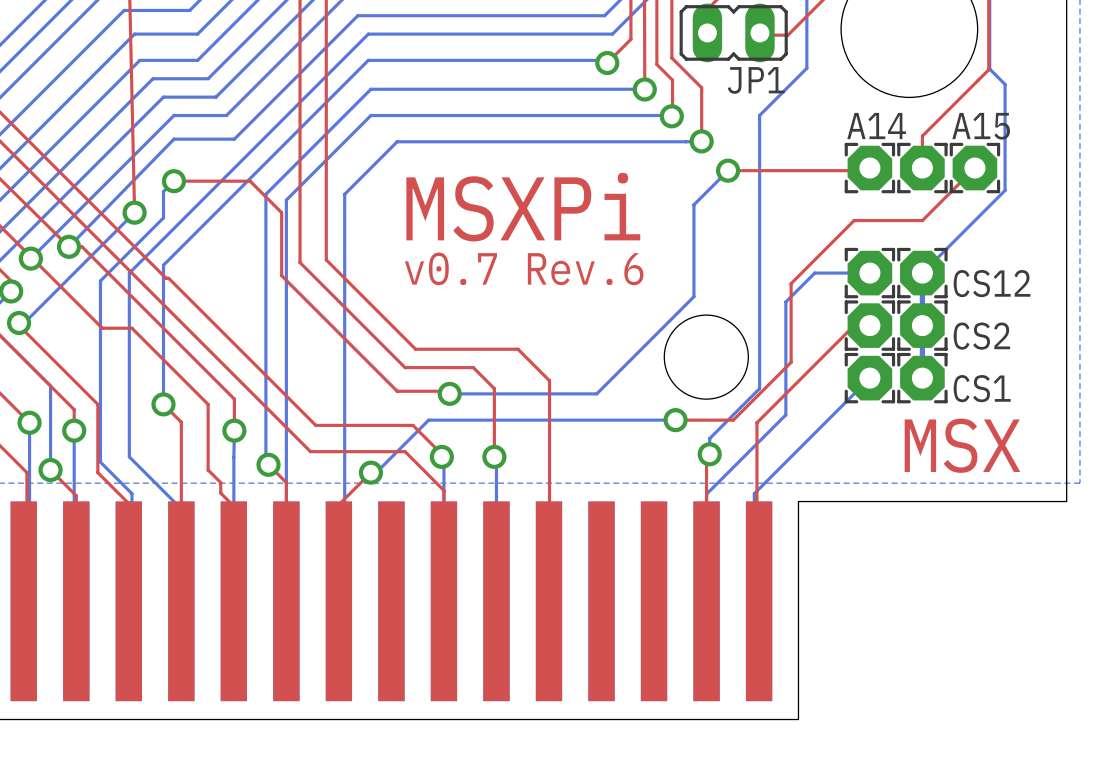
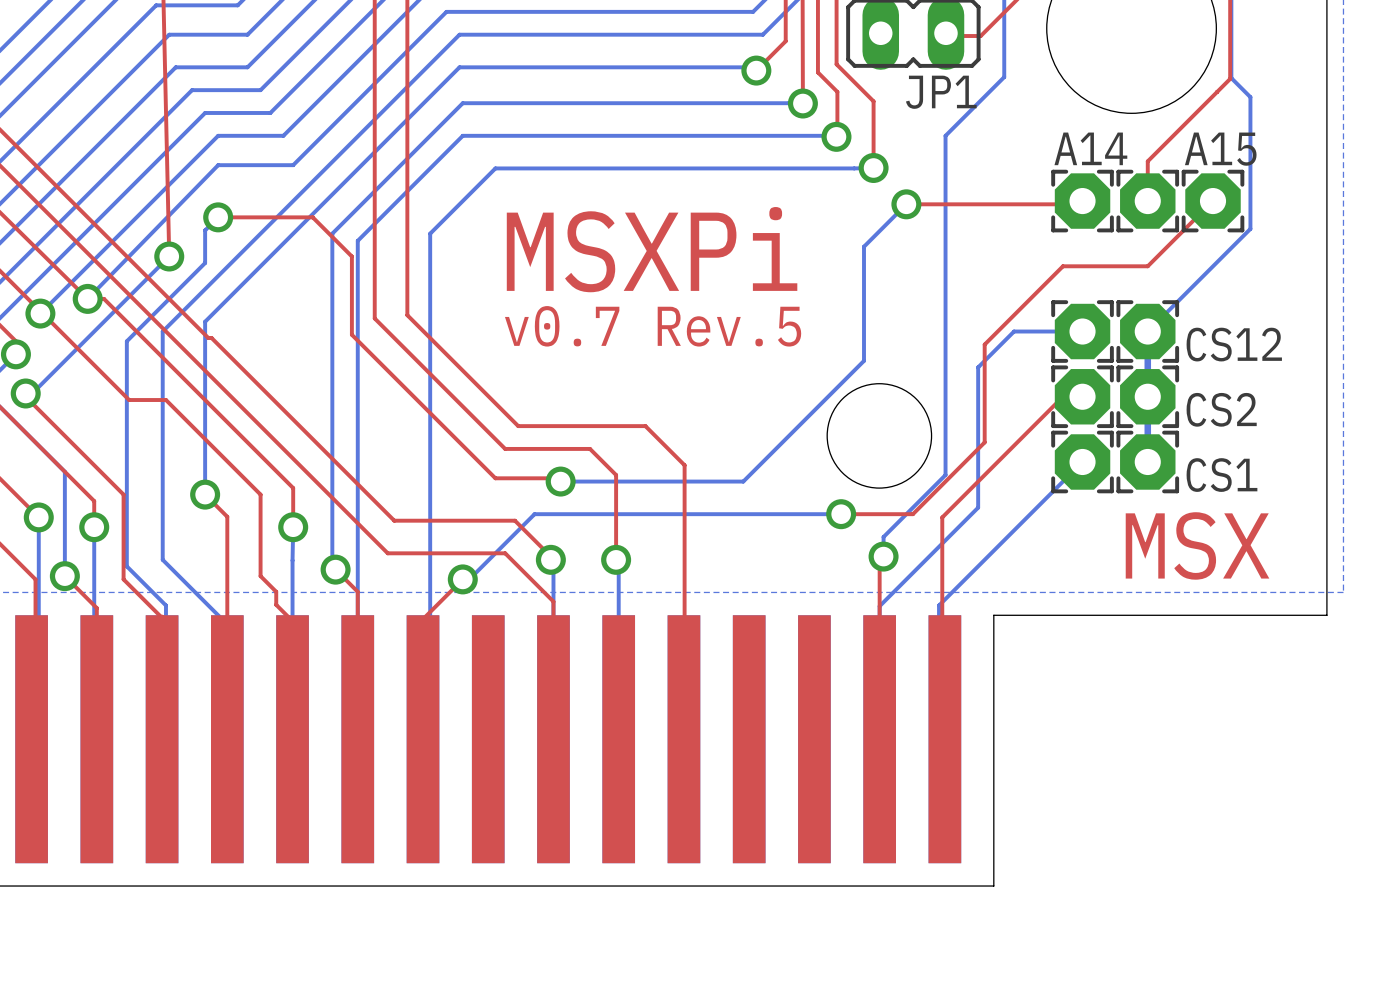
text: v0.7 Rev.6 (524, 268) -> v0.7 Rev.5 (653, 326)

